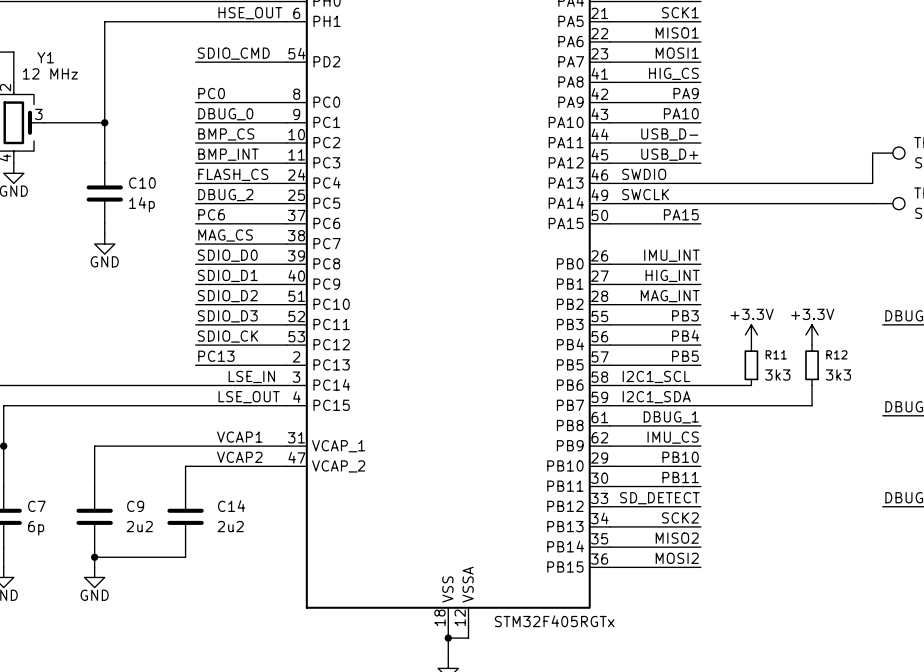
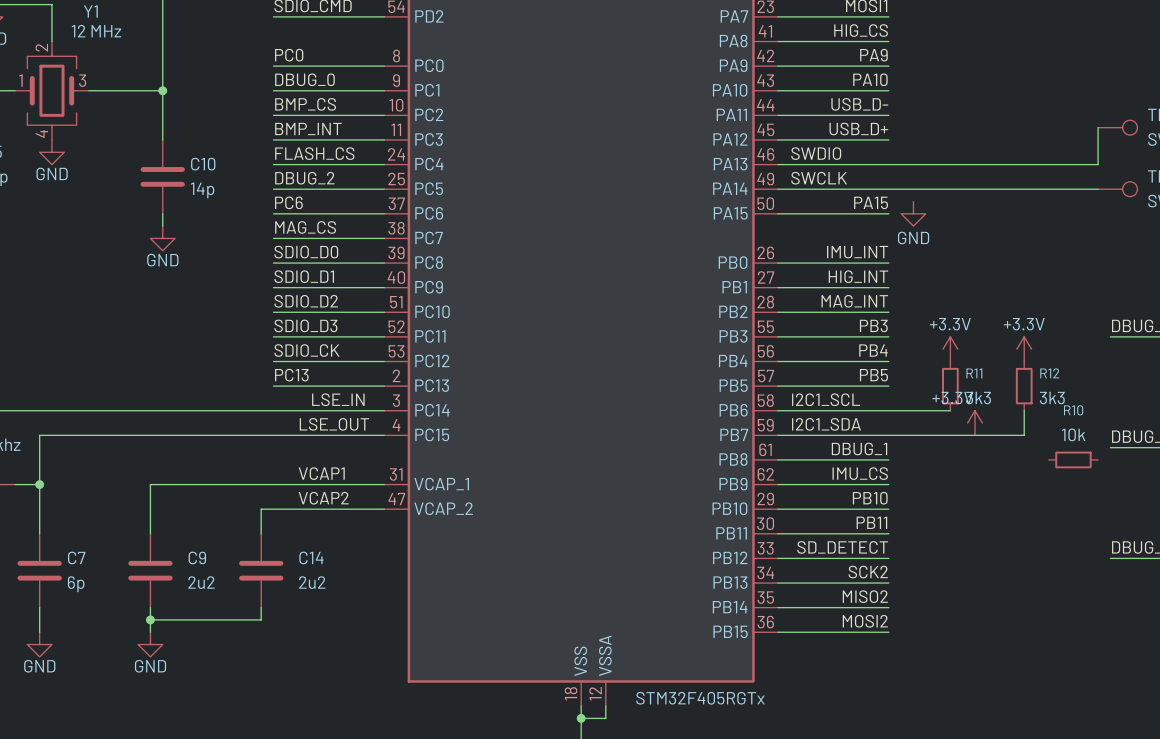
power symbol: none -> GND (913, 213)
power symbol: none -> +3.3V (975, 423)
R10: none -> 10k (1073, 459)

